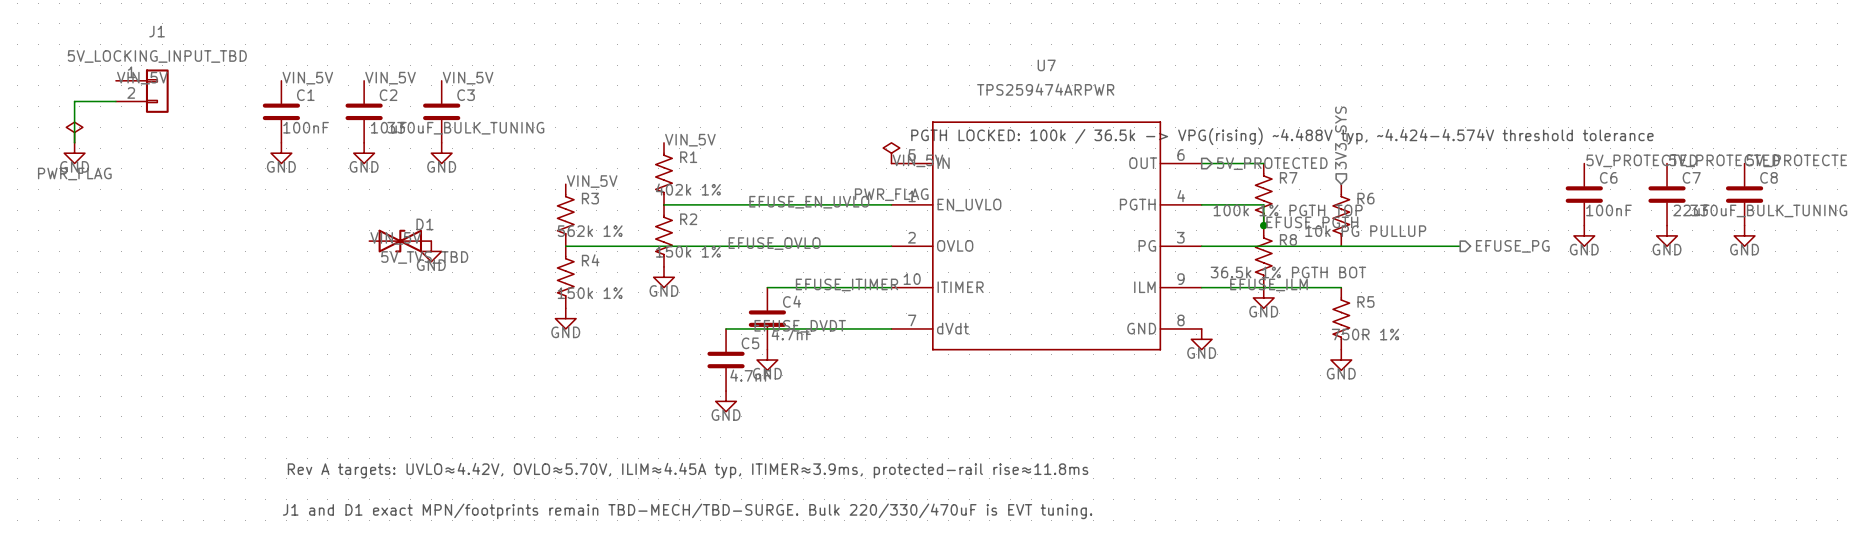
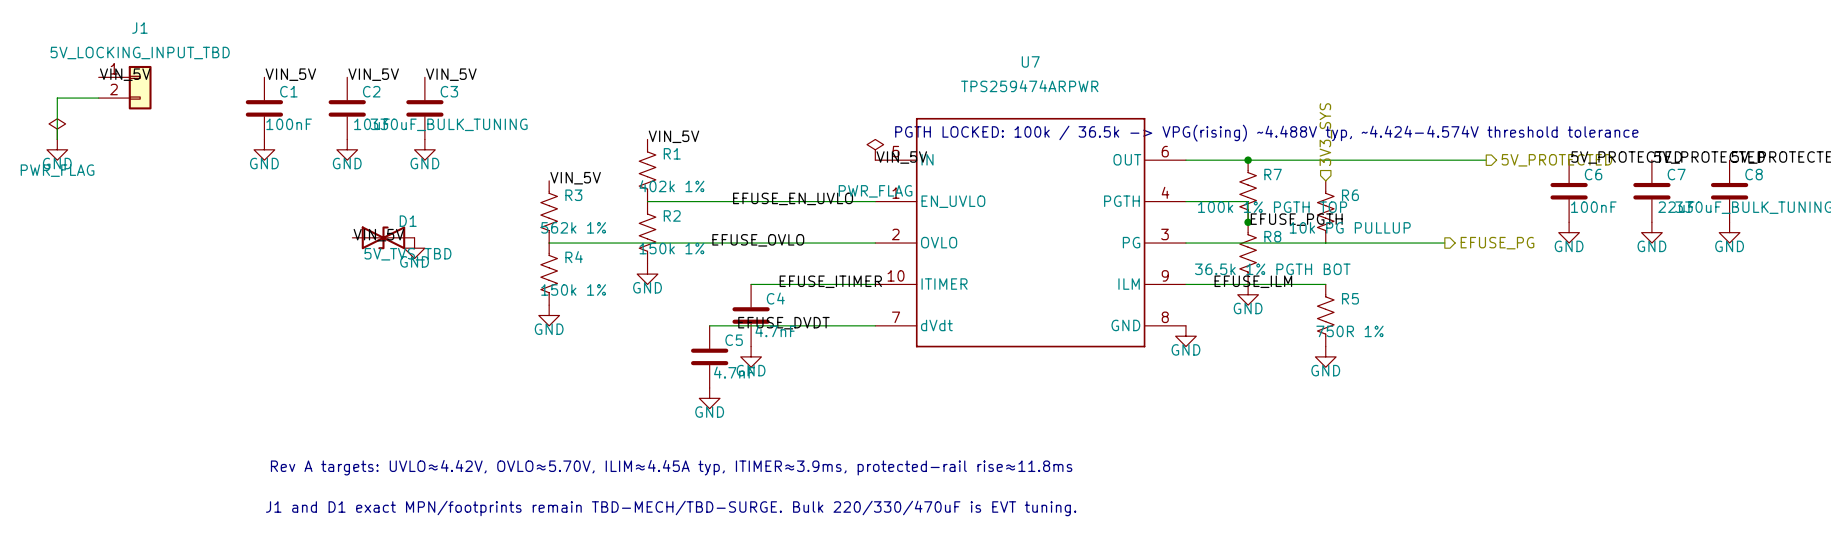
wire: none -> (1248, 160) (1486, 160)
junction: none -> (1248, 160)
hierarchical label: 5V_PROTECTED (1272, 163) -> none
hierarchical label: none -> 5V_PROTECTED (1556, 160)

